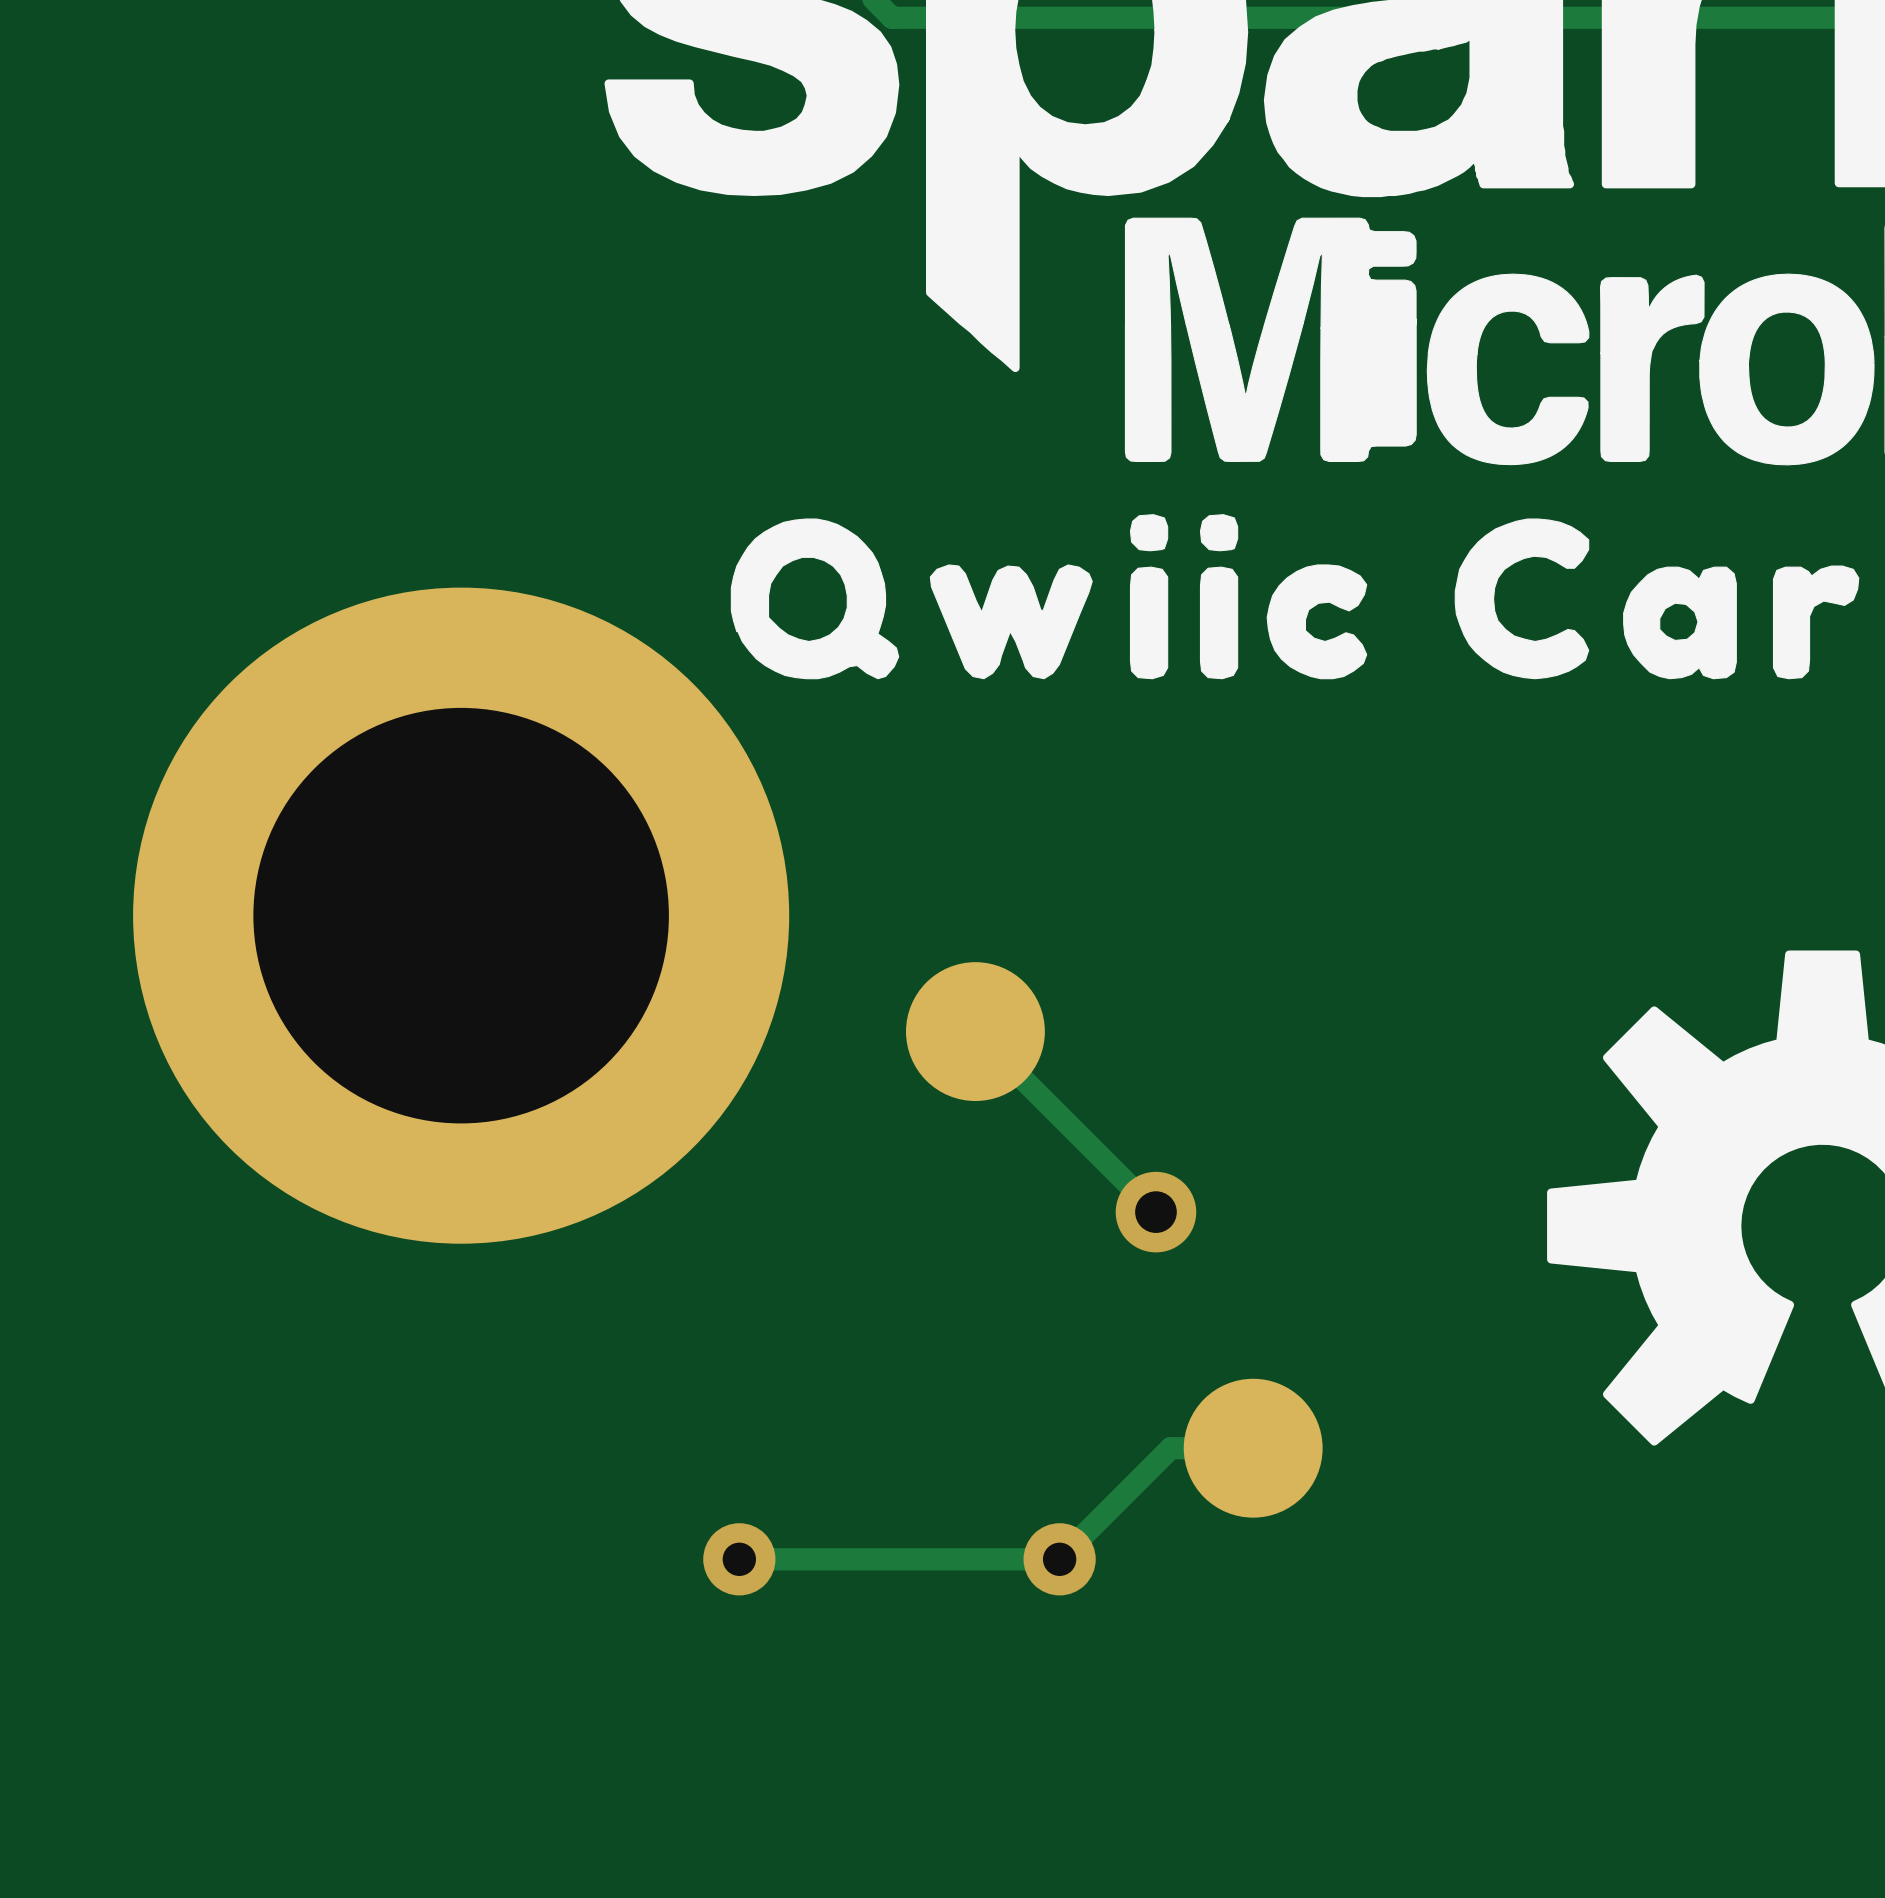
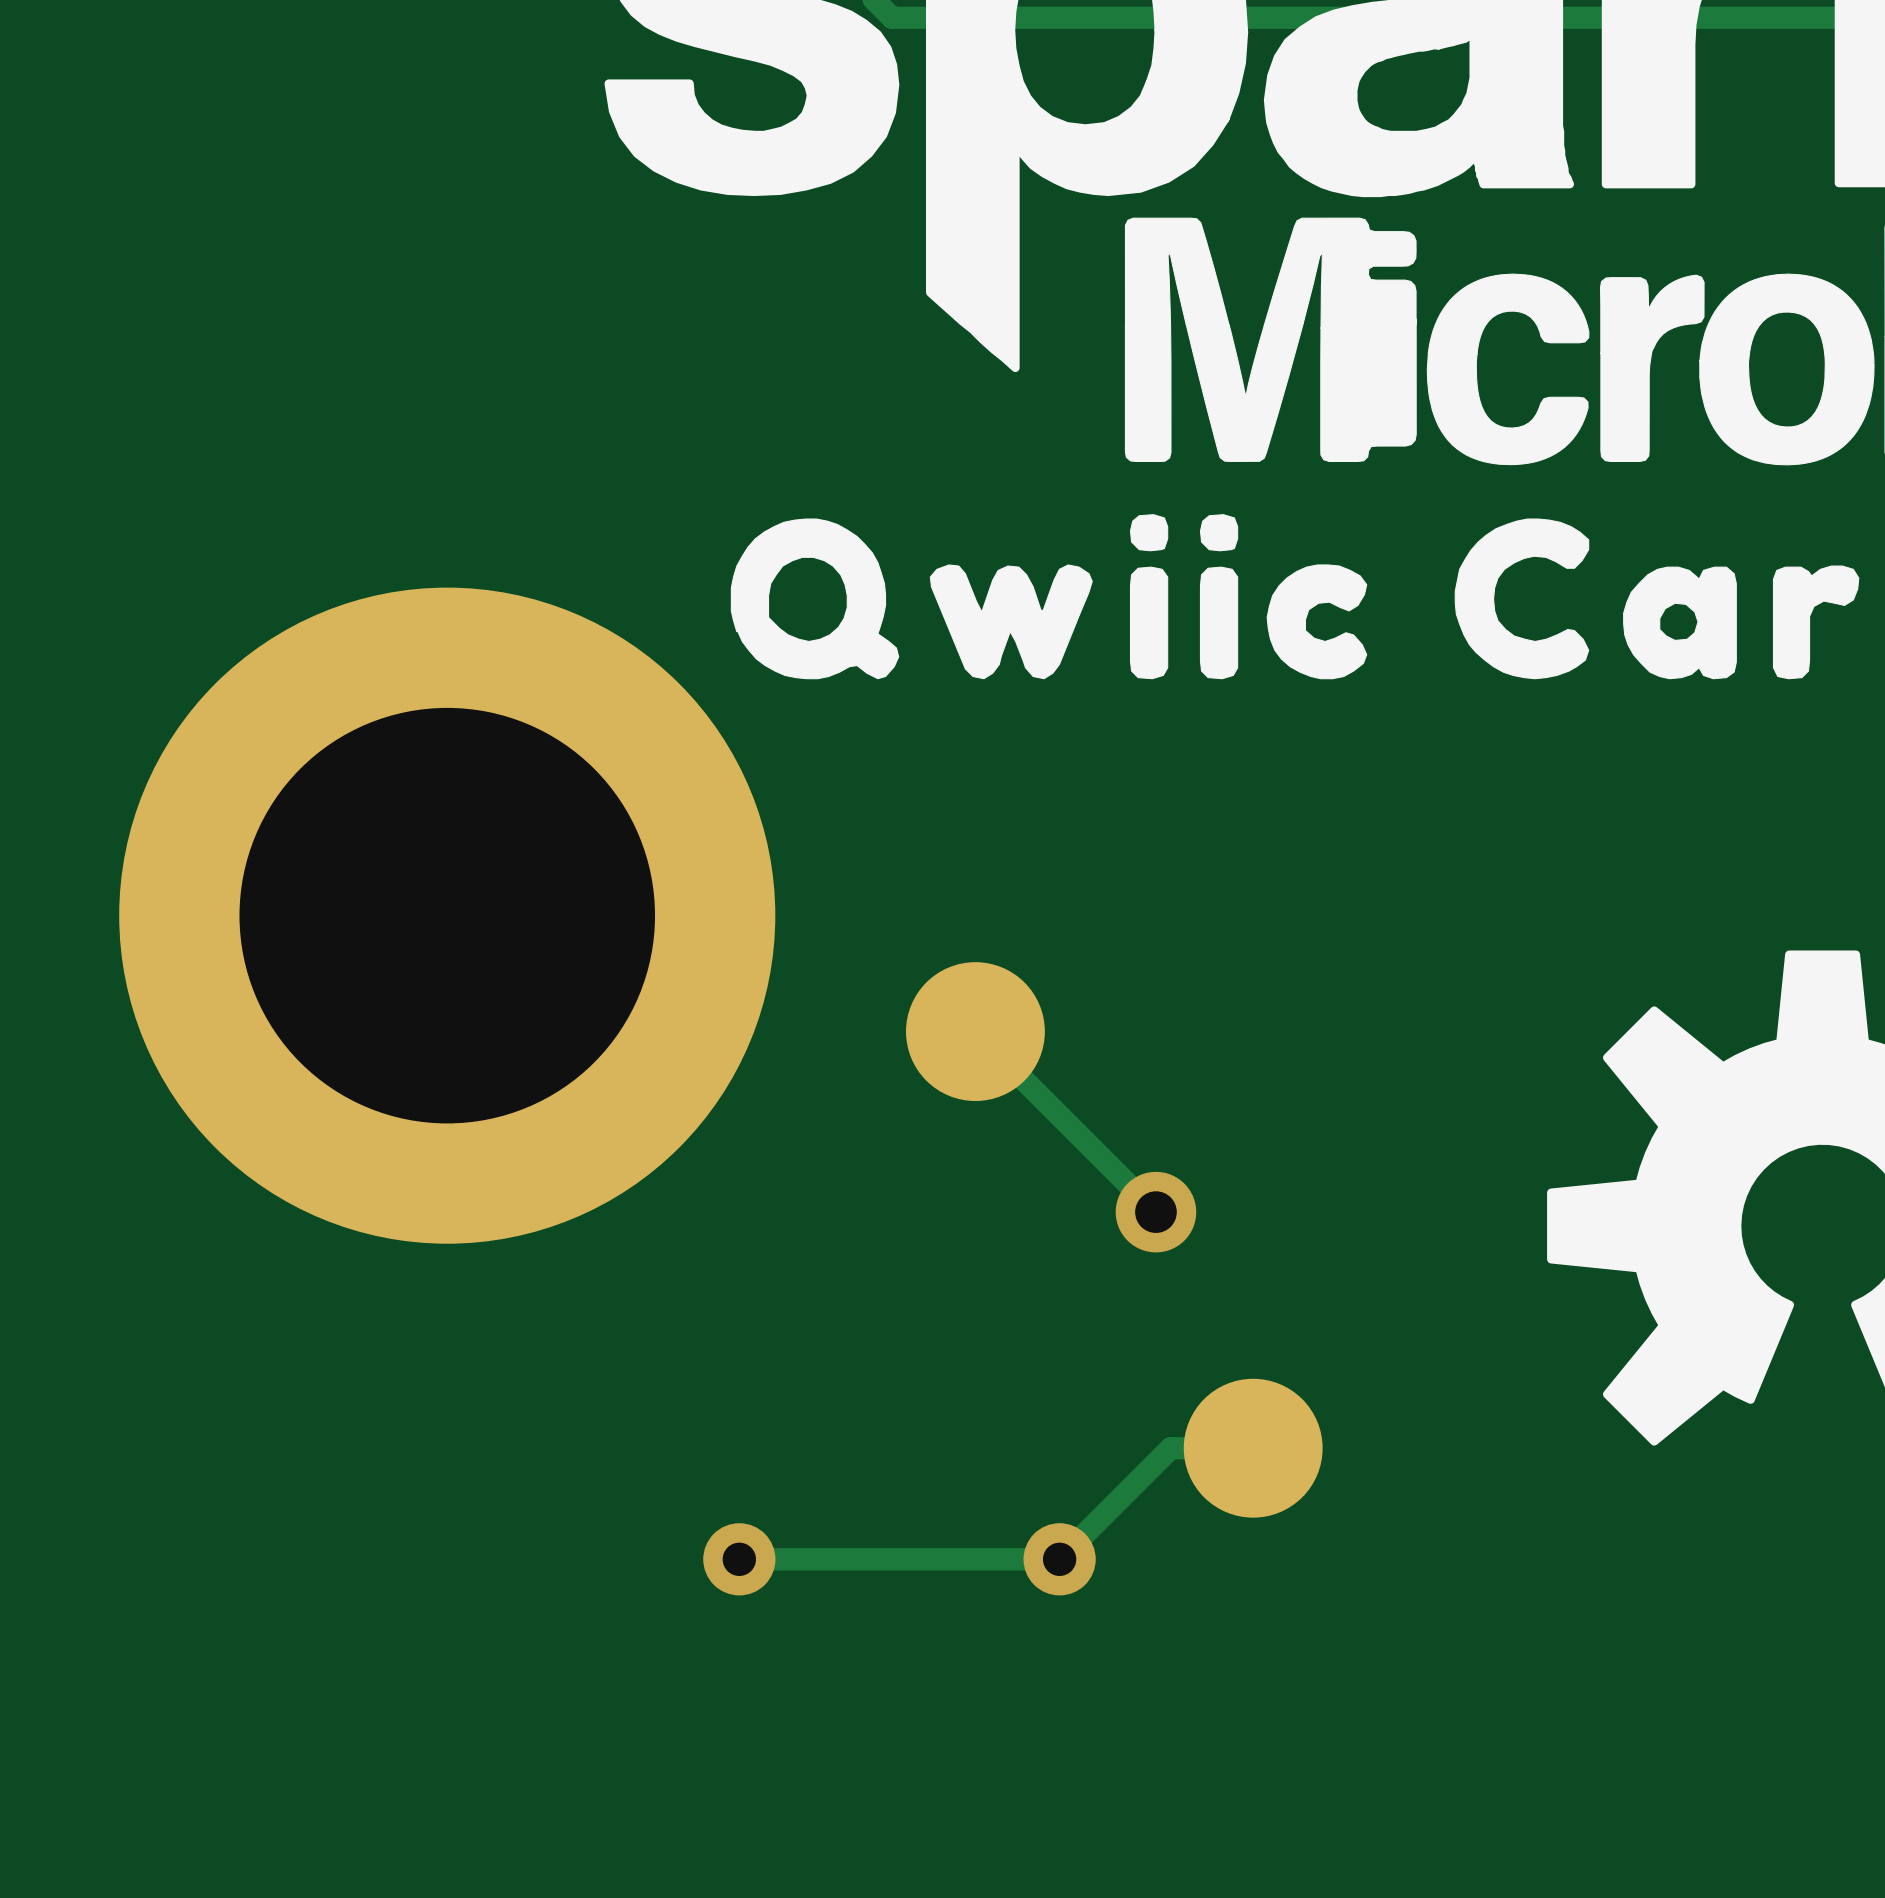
part position: (461, 915) -> (447, 915)

